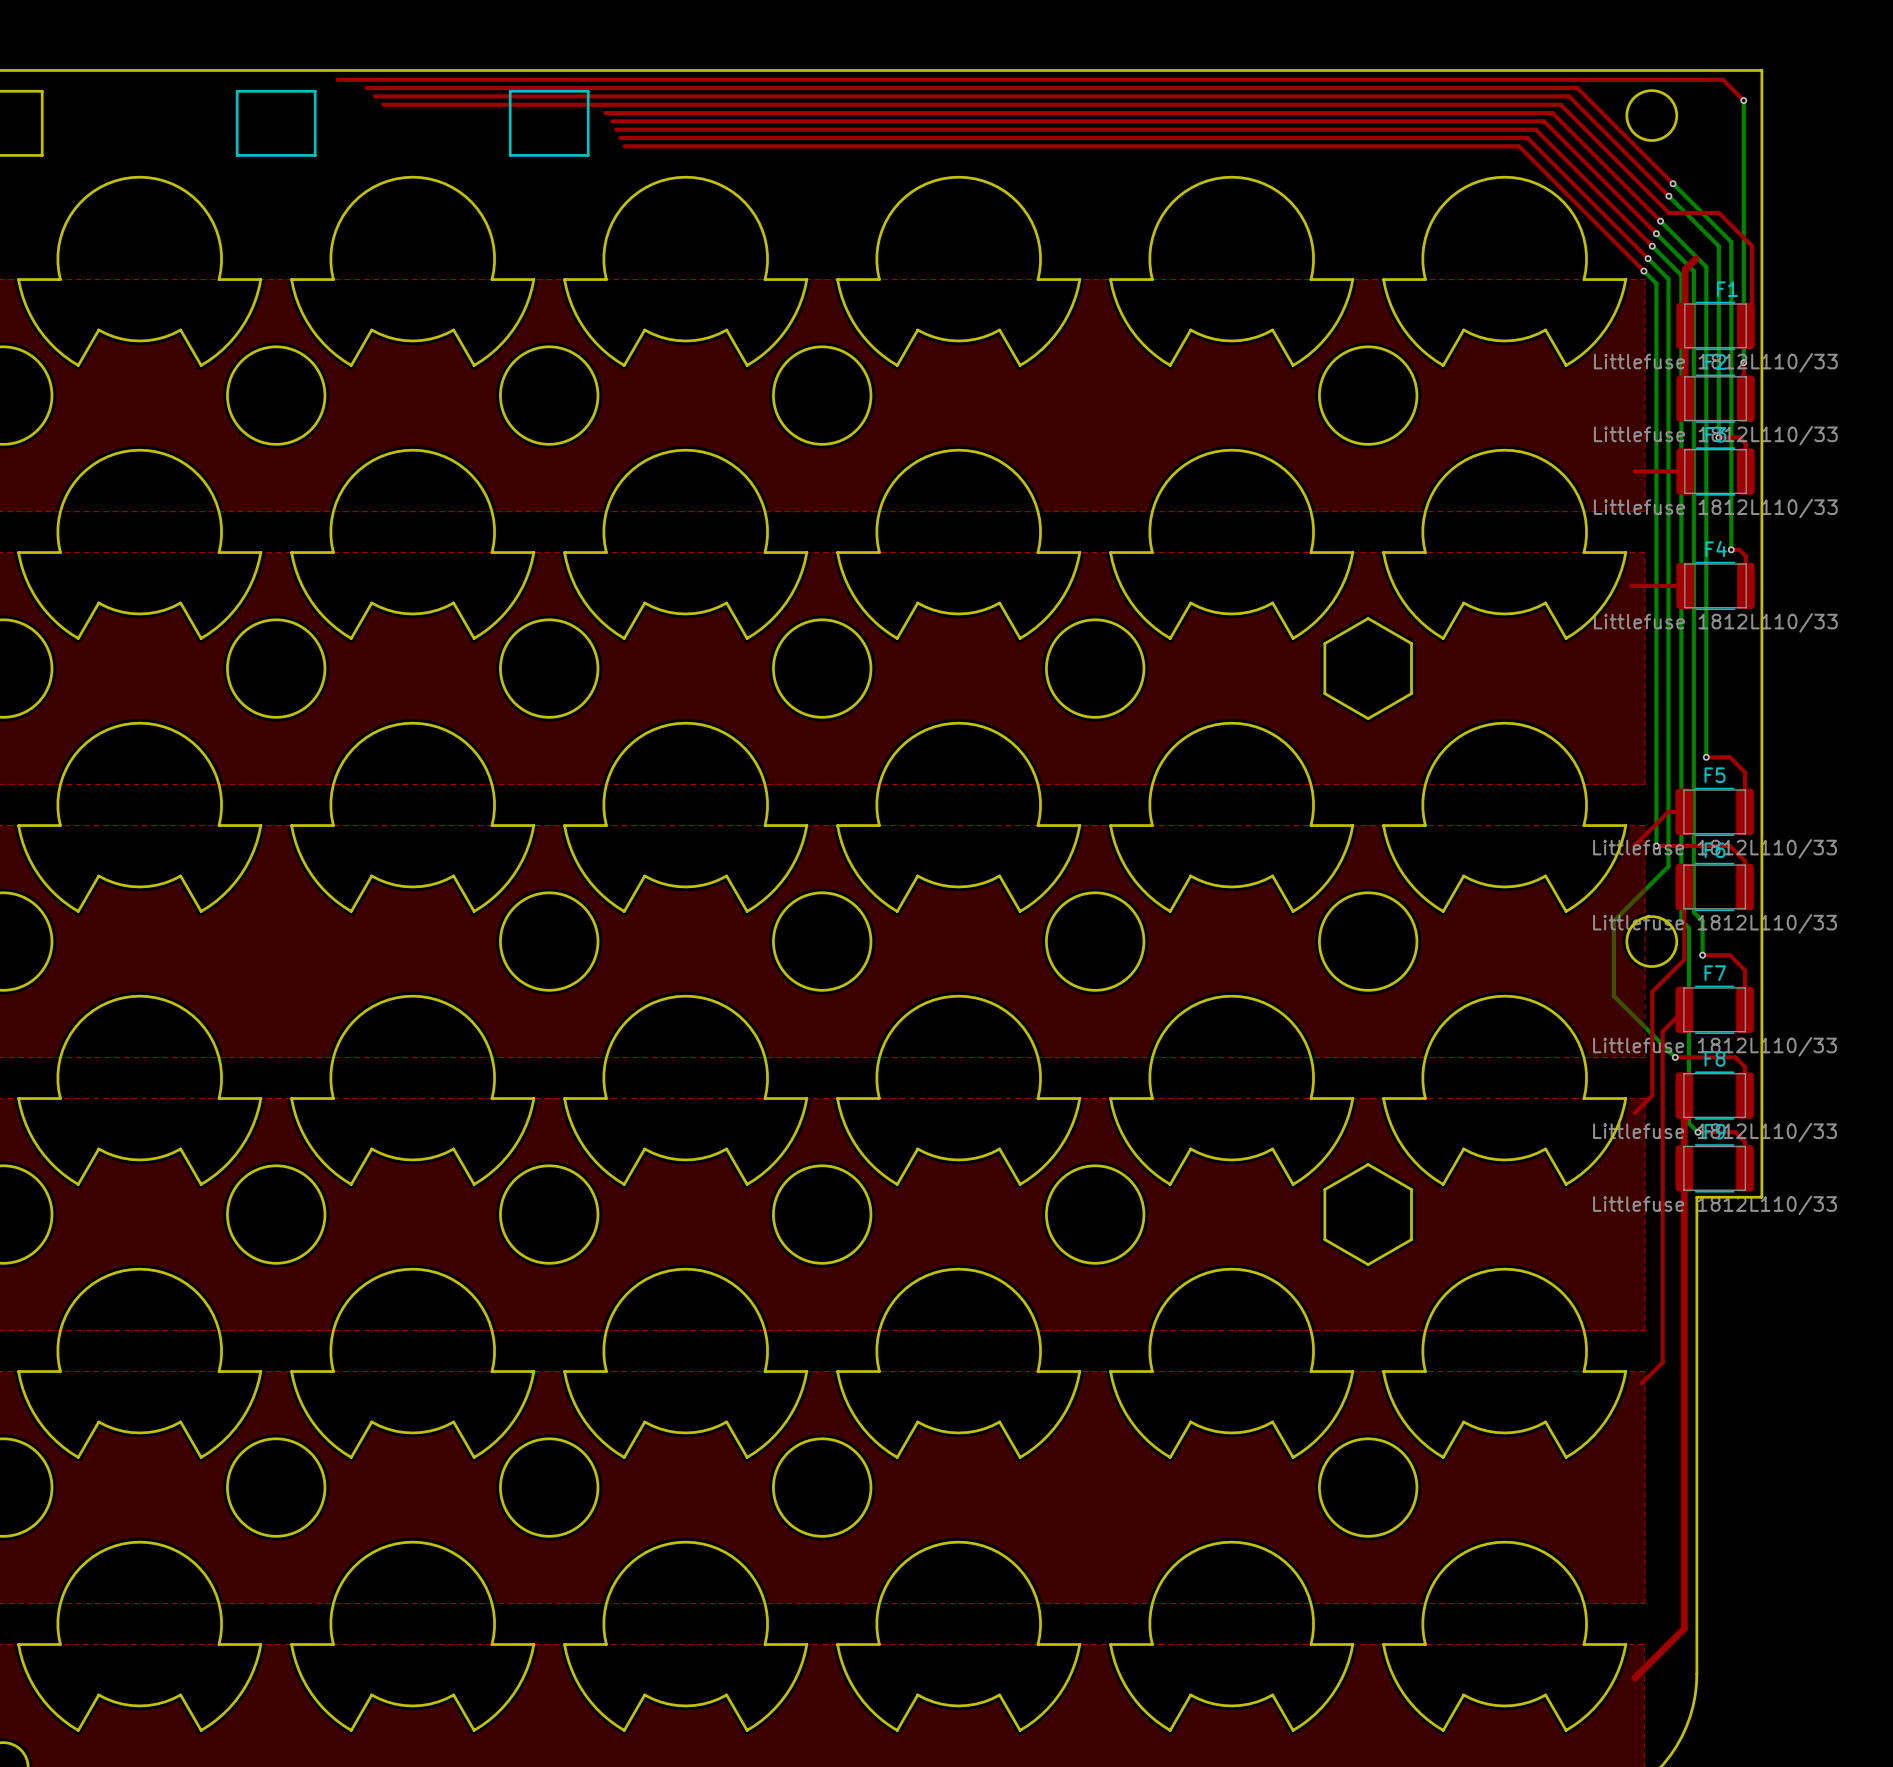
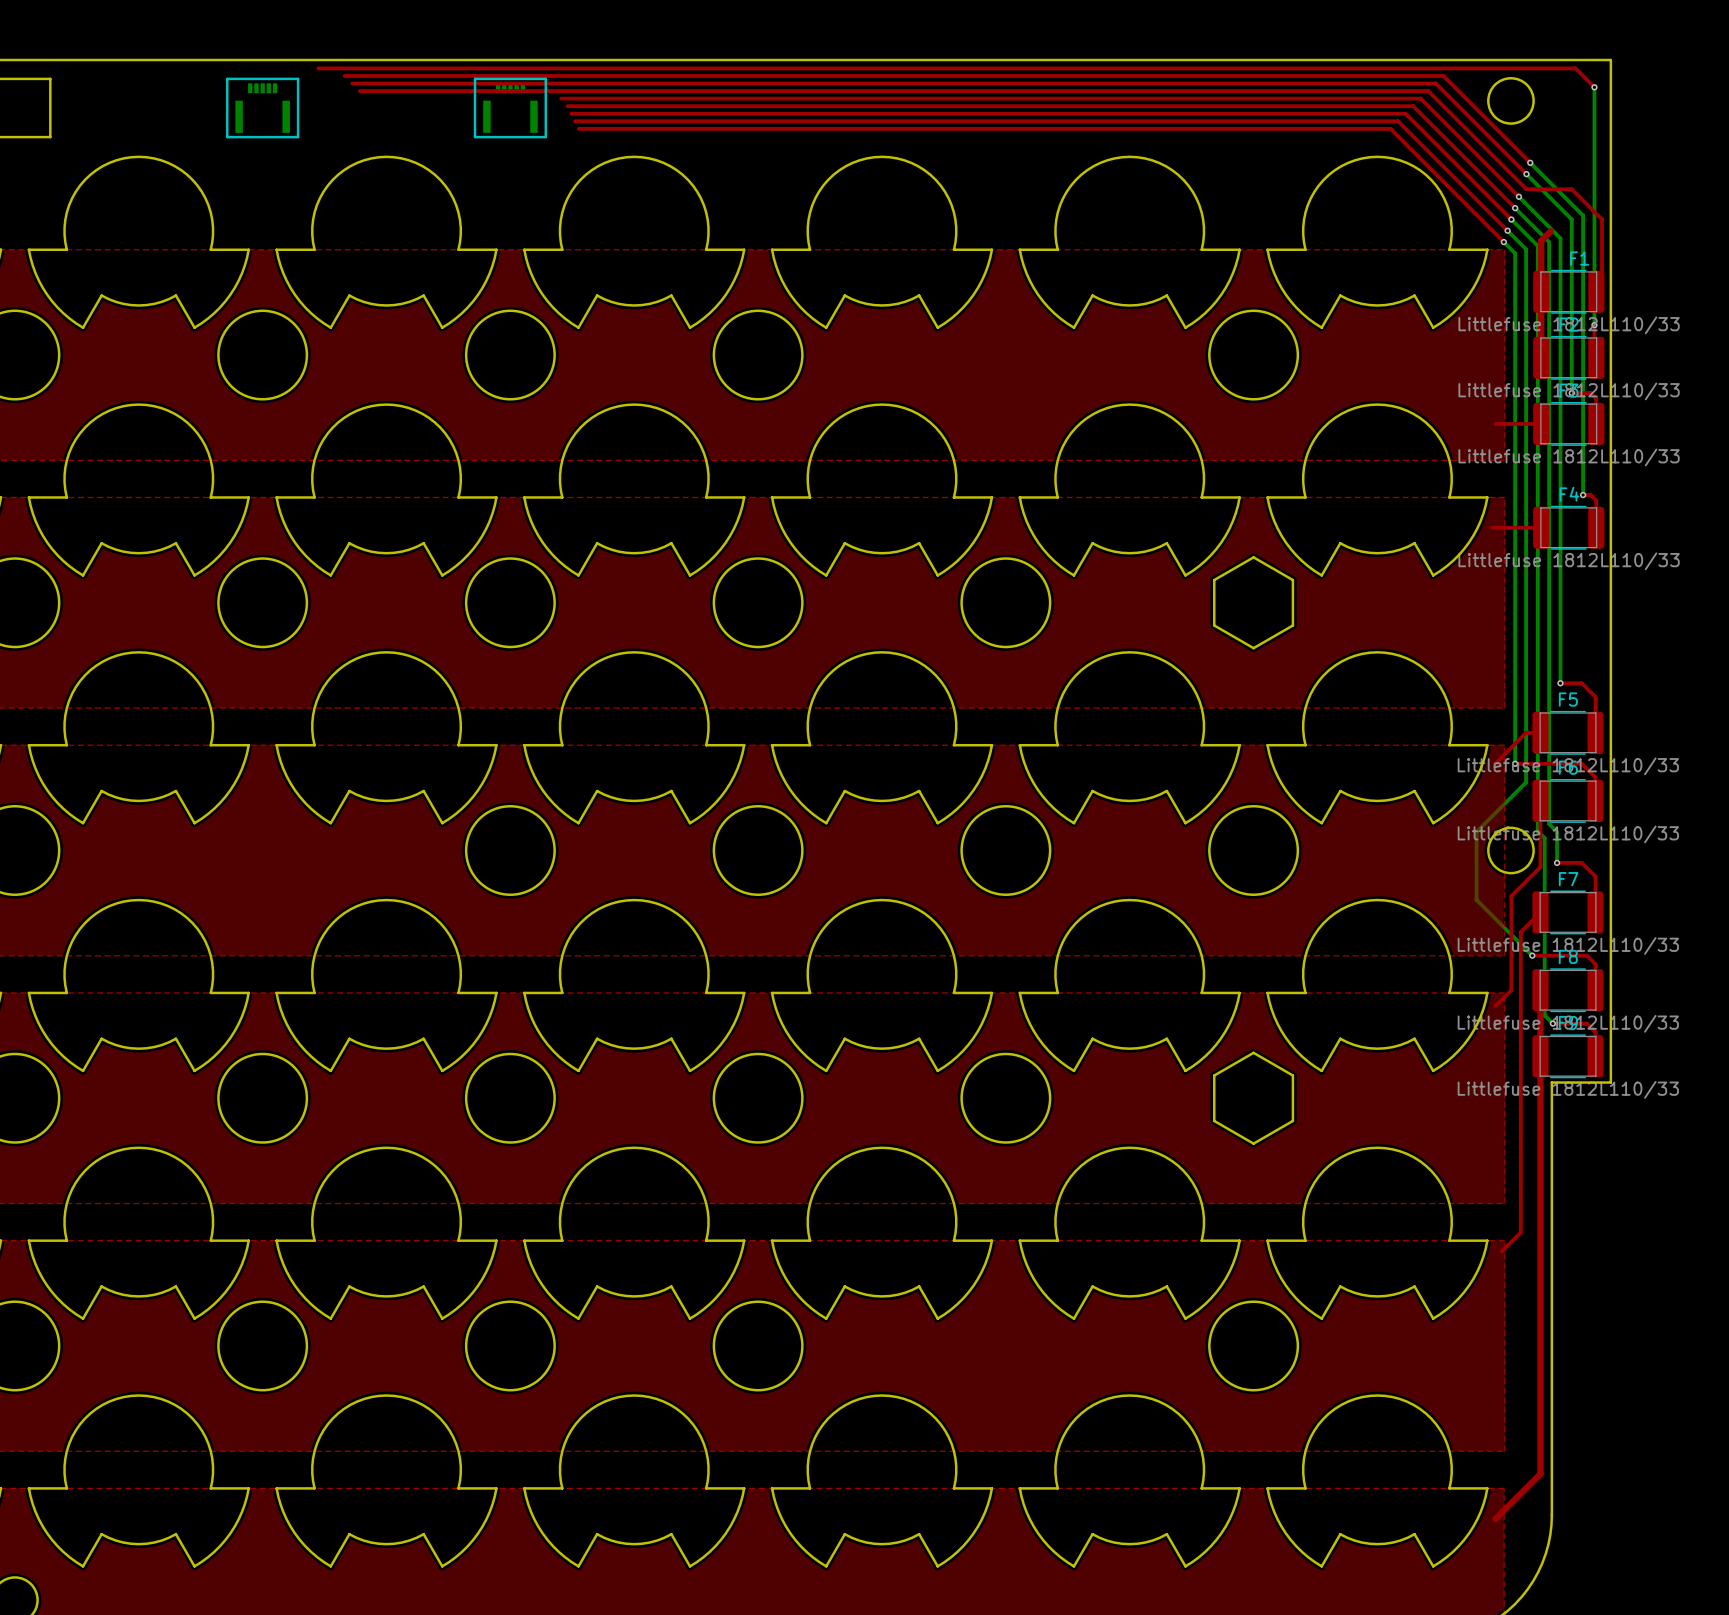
part: none -> (262, 108)
part: none -> (510, 108)

